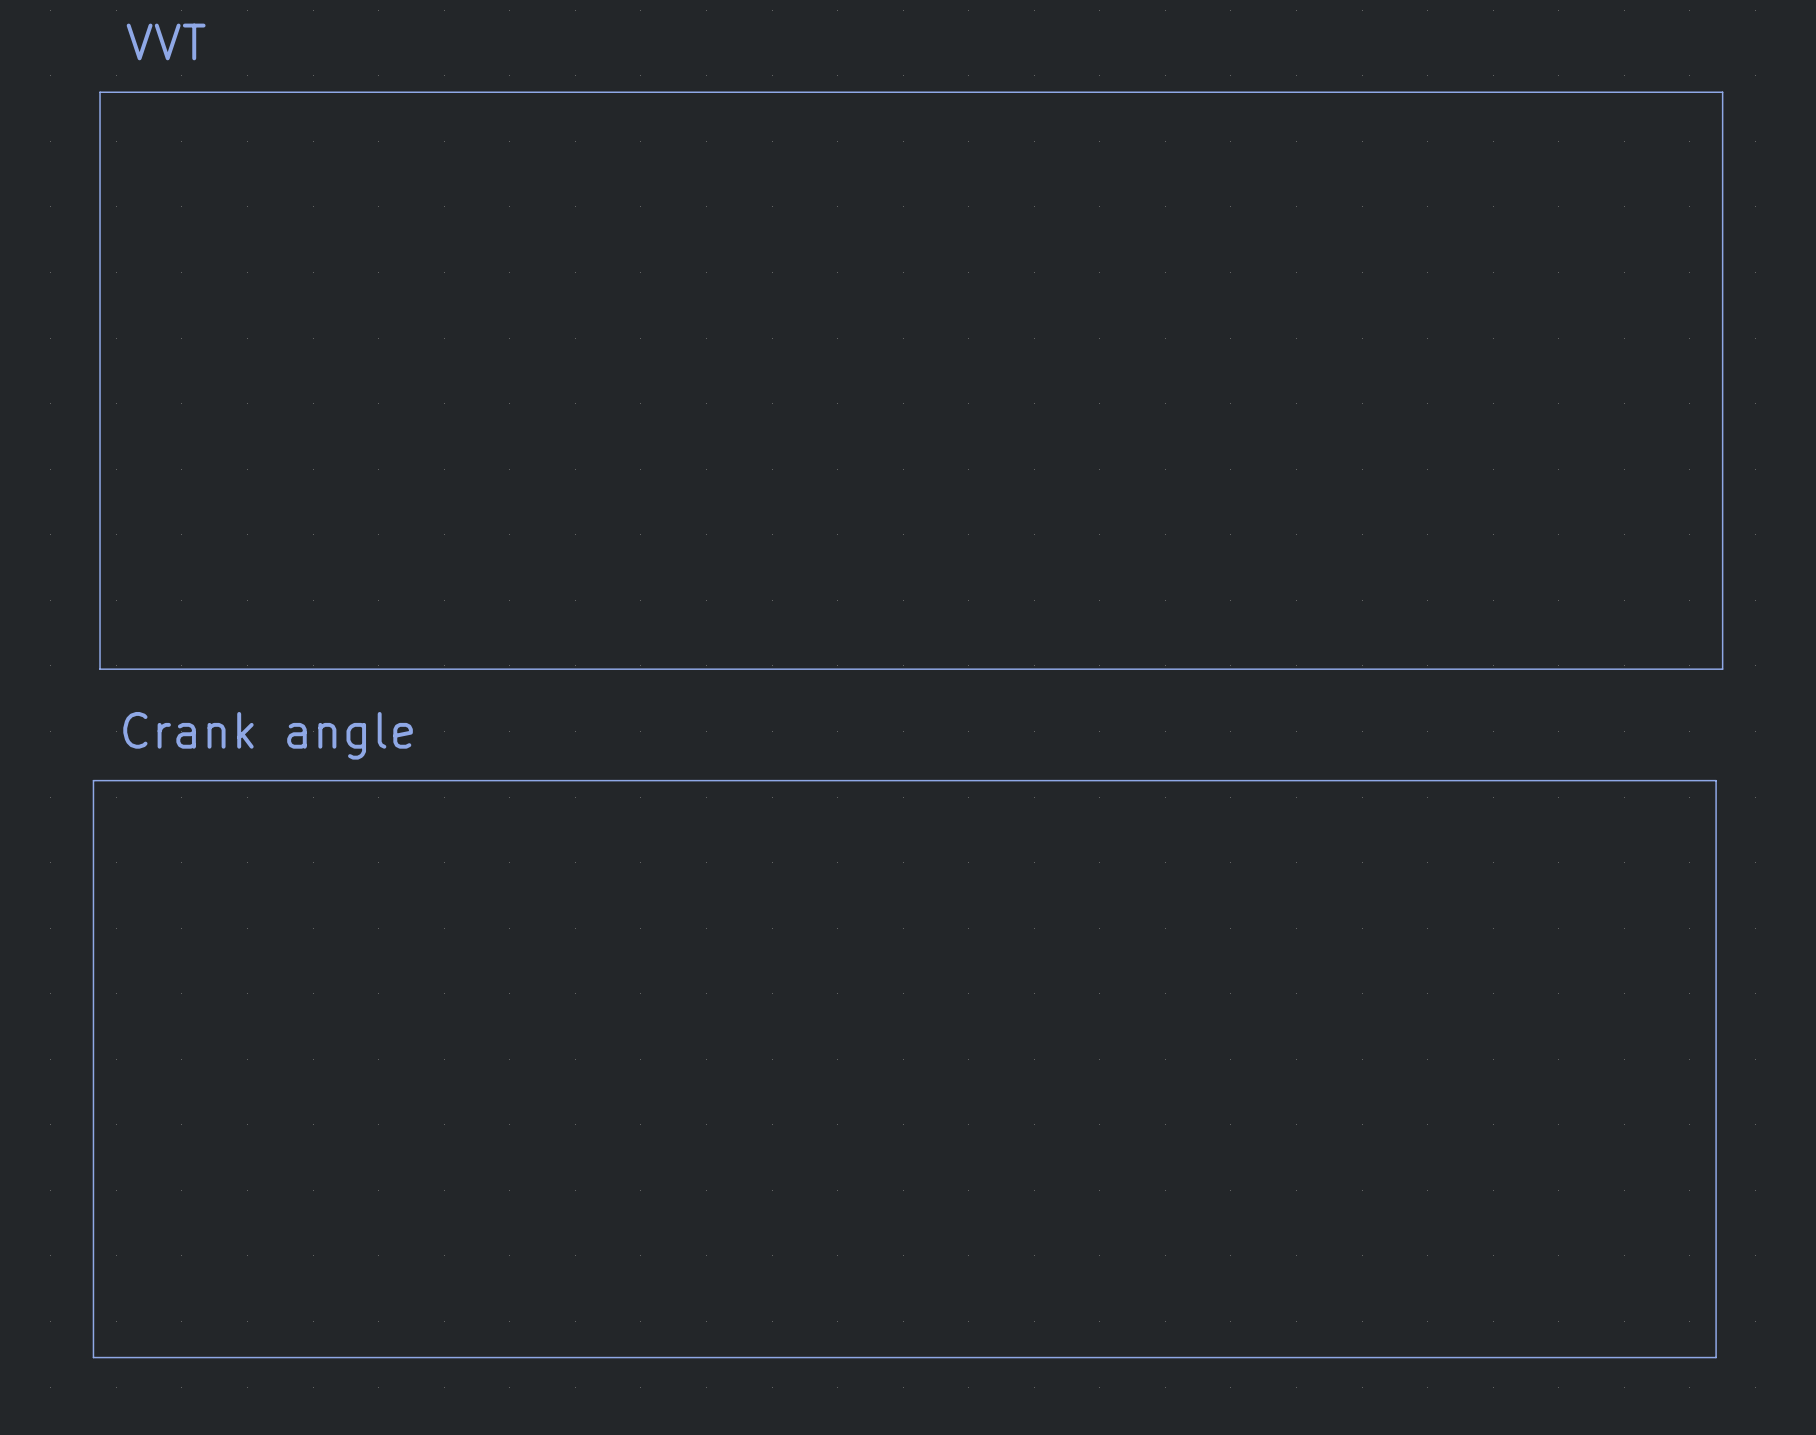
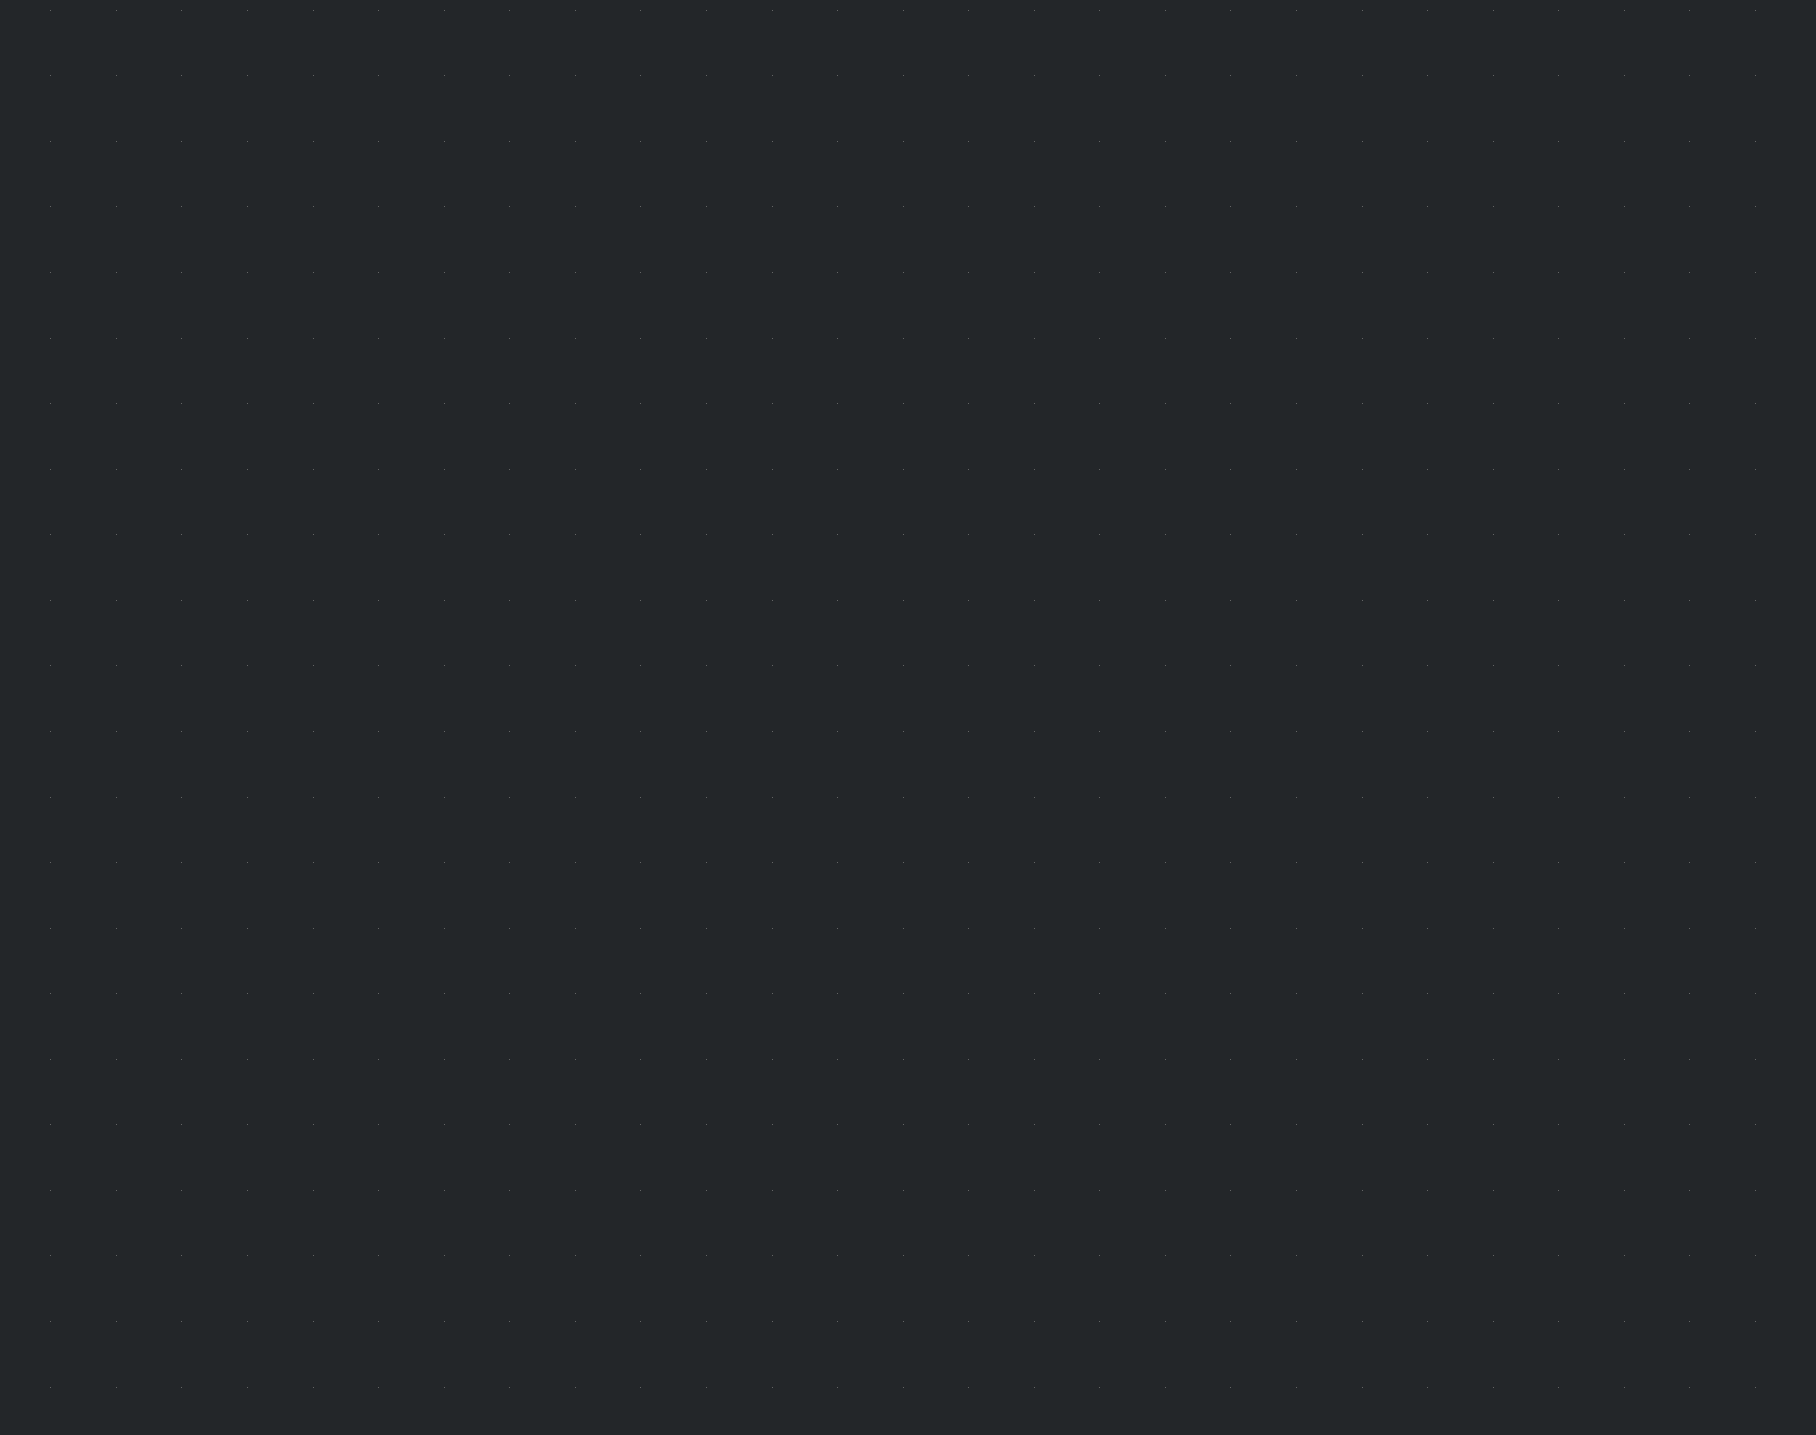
text: VVT (166, 41) -> none
line: (100, 92) (1722, 92) (1722, 669) (100, 669) (100, 92) -> none
text: Crank angle (268, 735) -> none
line: (93, 780) (1716, 780) (1716, 1357) (93, 1357) (93, 780) -> none

